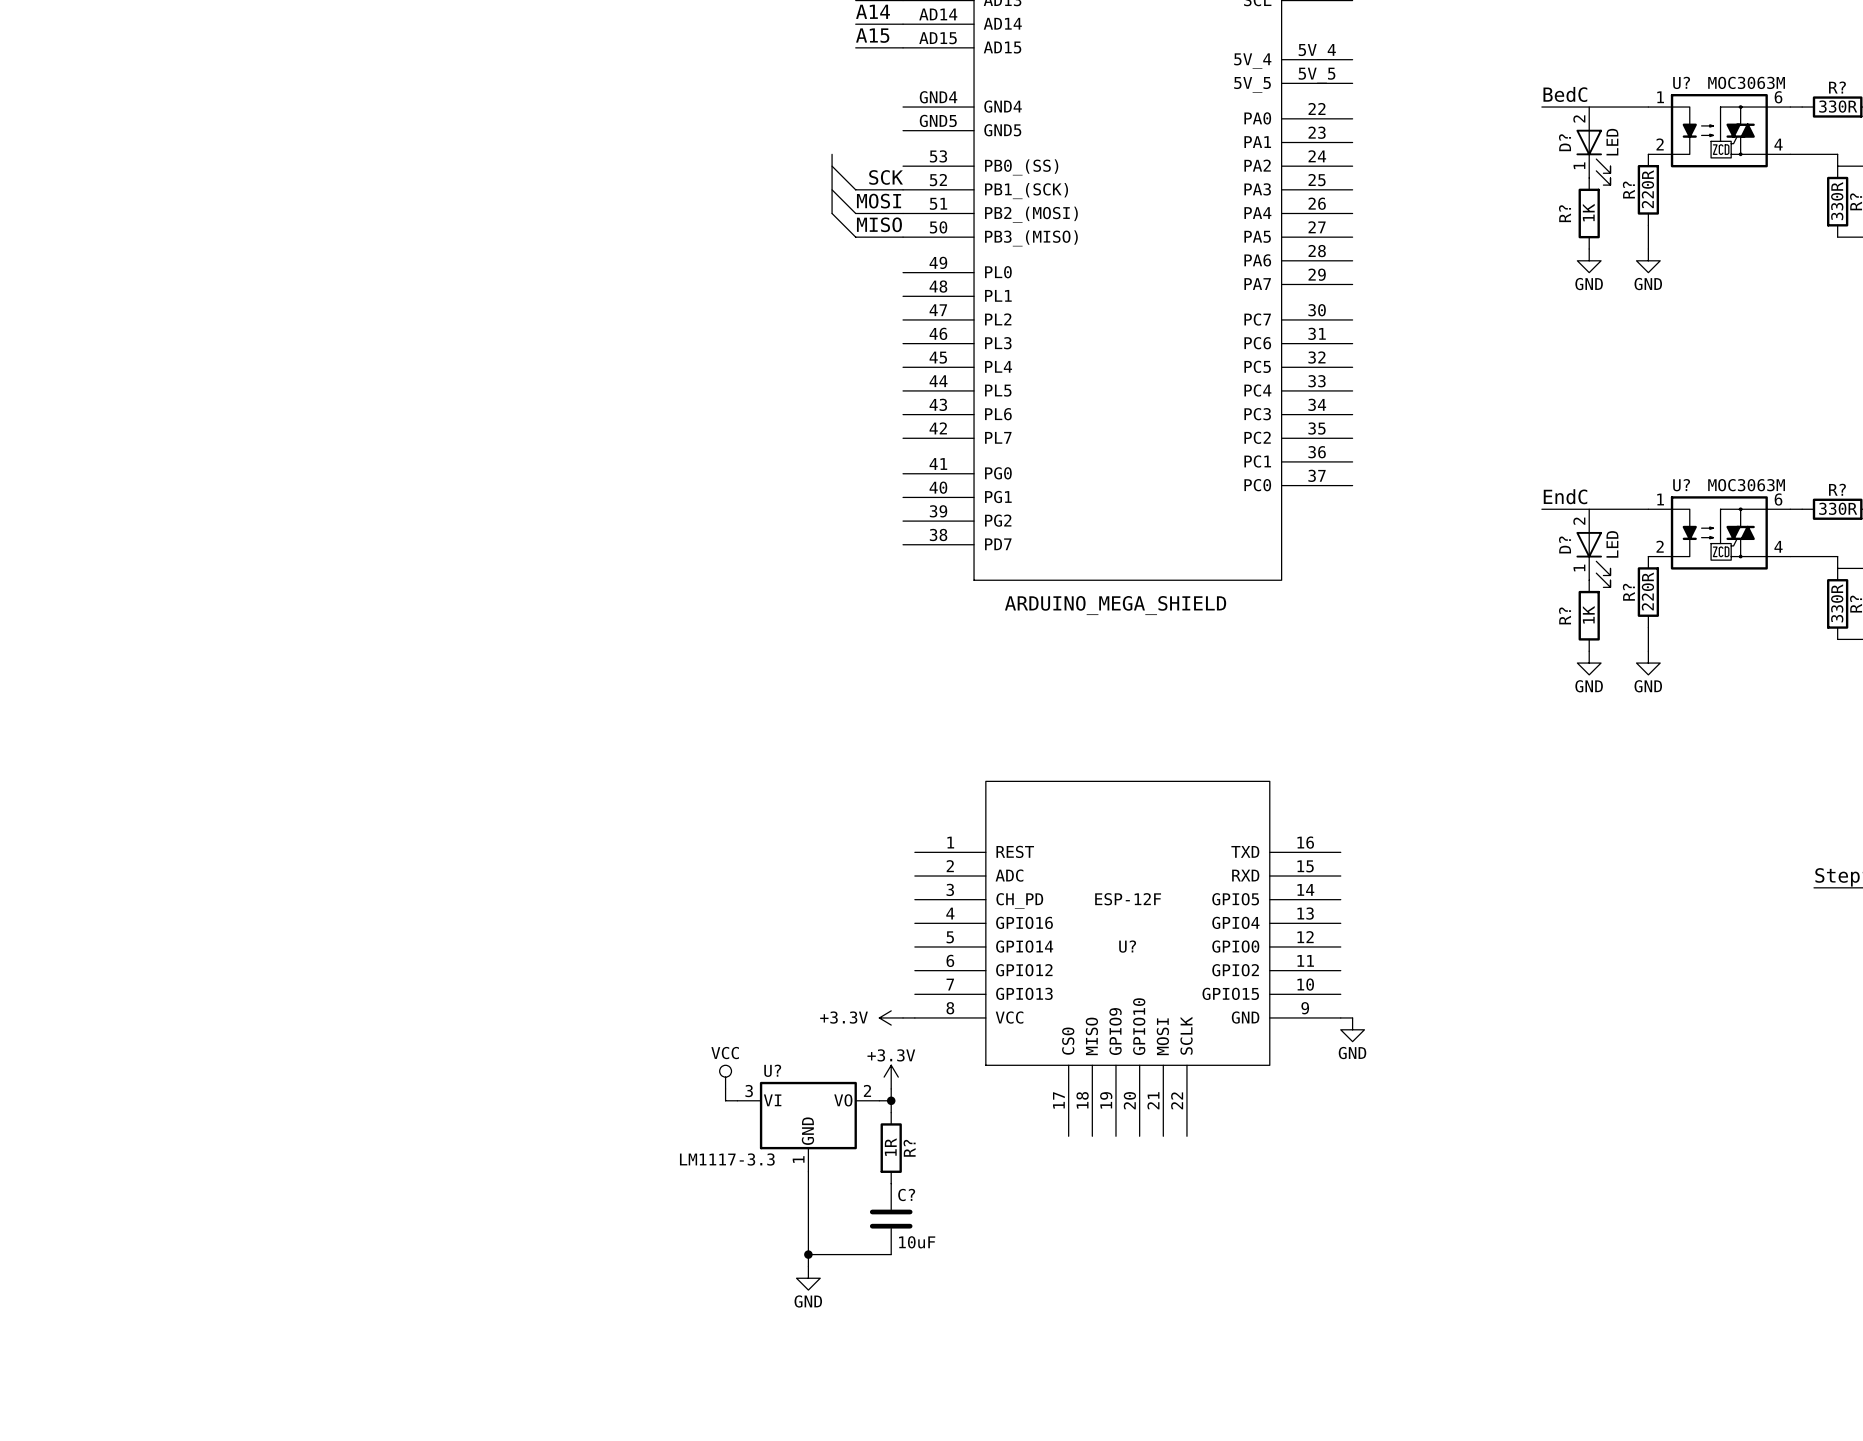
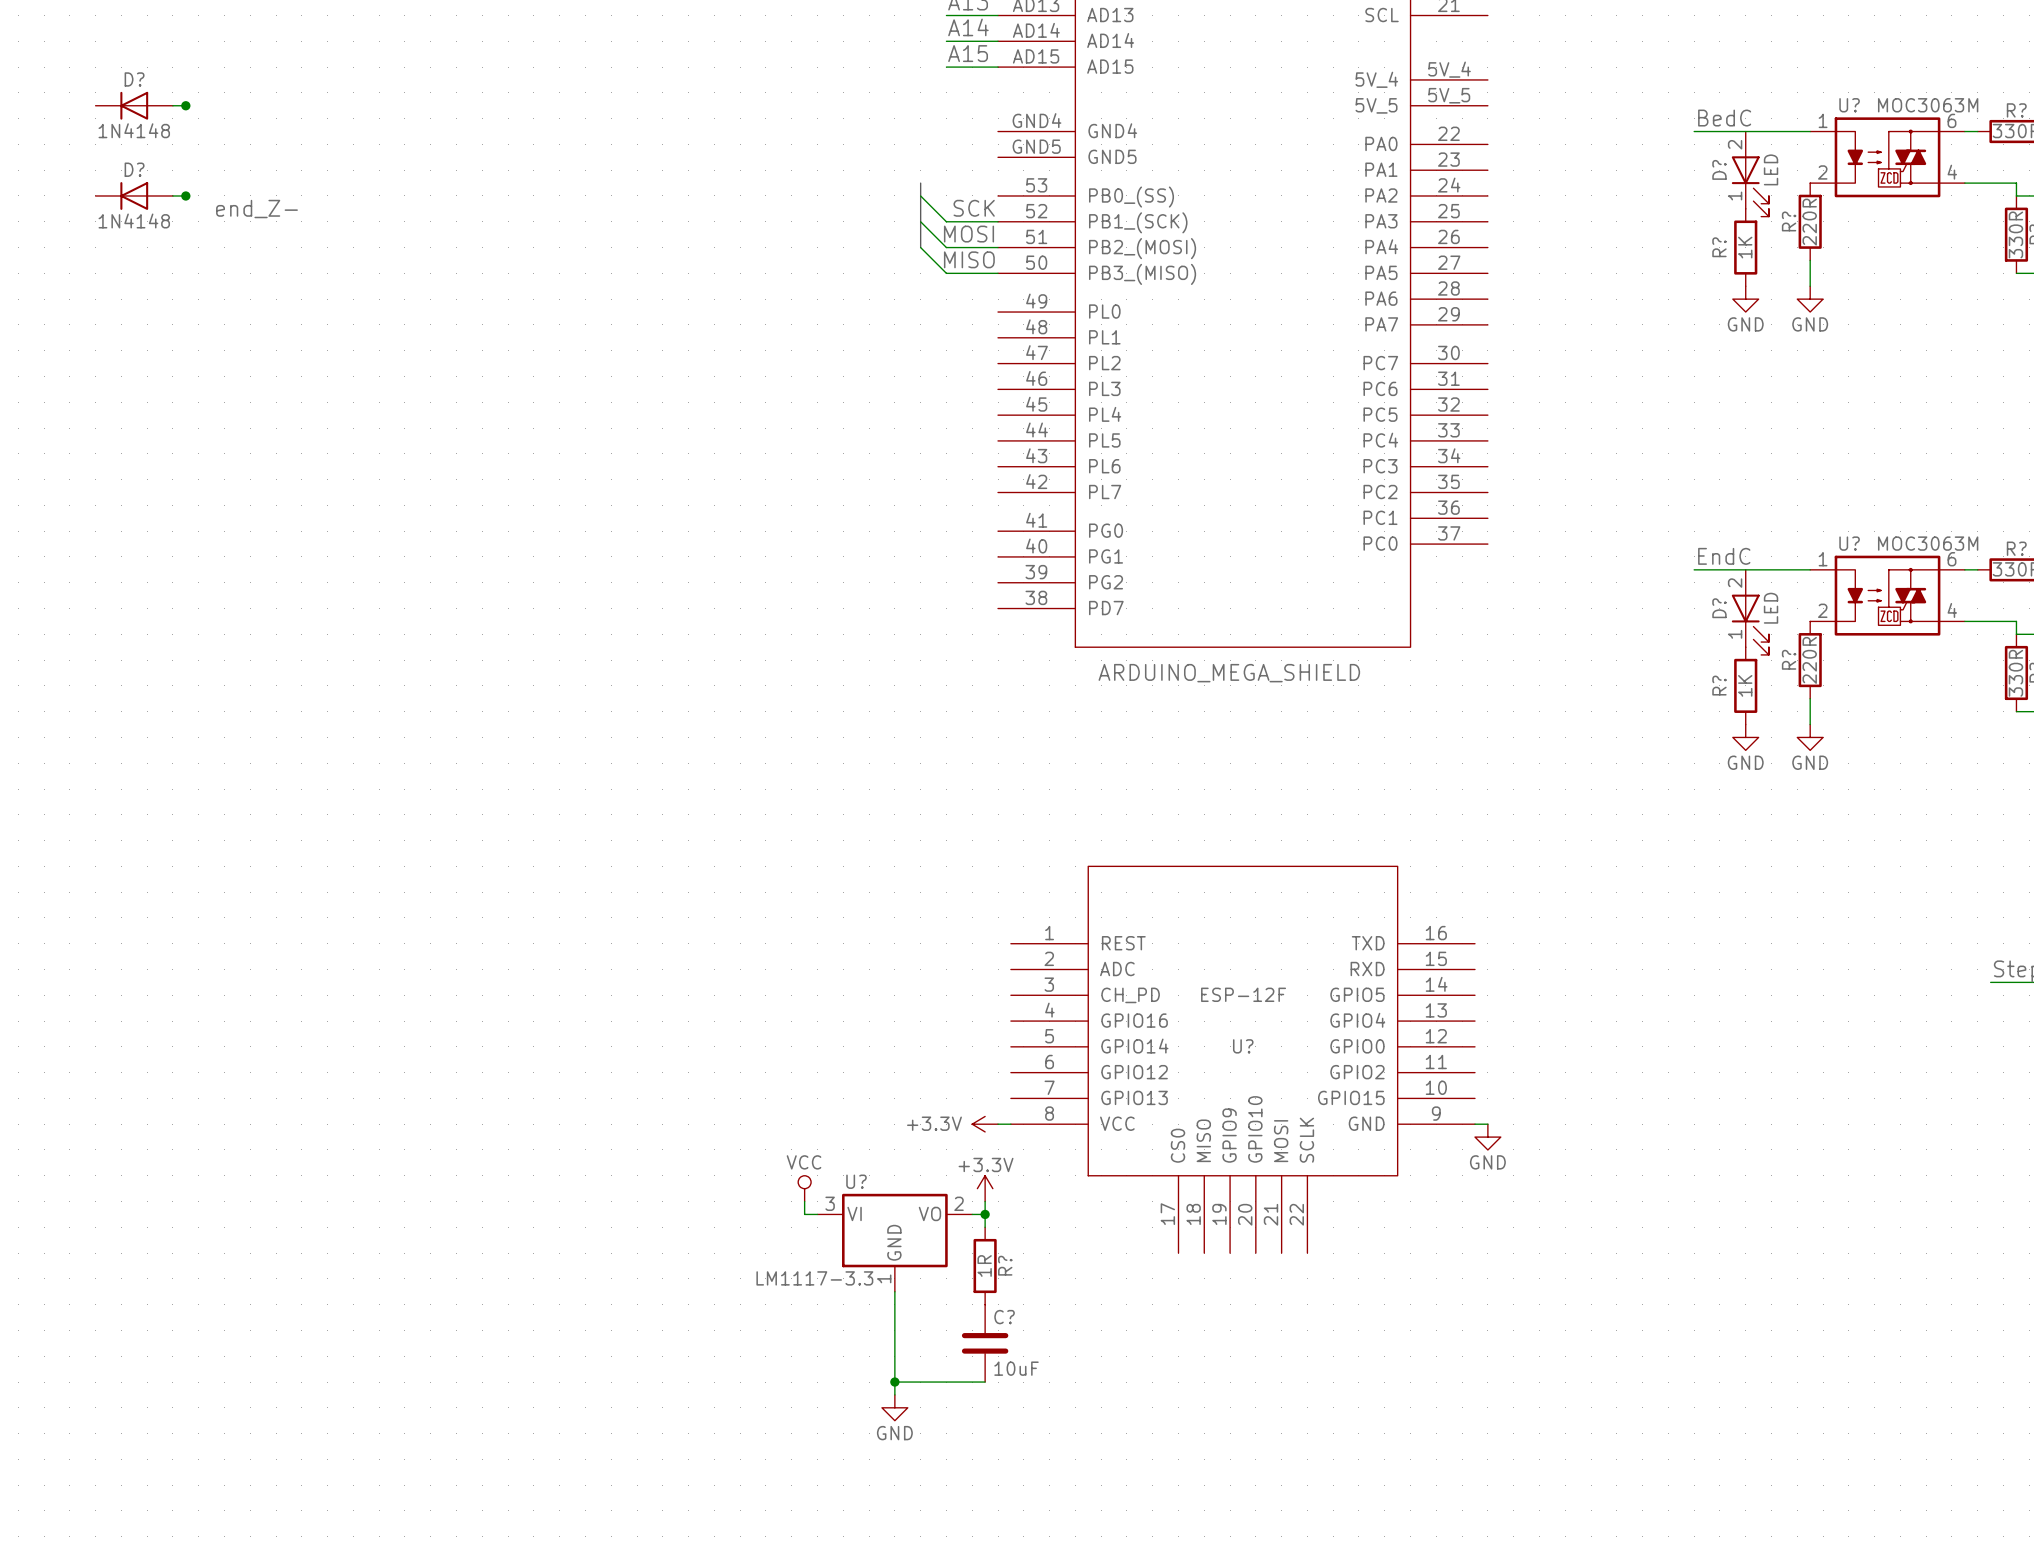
D?: none -> 1N4148 (134, 105)
wire: none -> (172, 105) (185, 105)
junction: none -> (185, 105)
D?: none -> 1N4148 (134, 195)
wire: none -> (172, 195) (185, 195)
junction: none -> (185, 195)
label: none -> end_Z- (257, 209)

